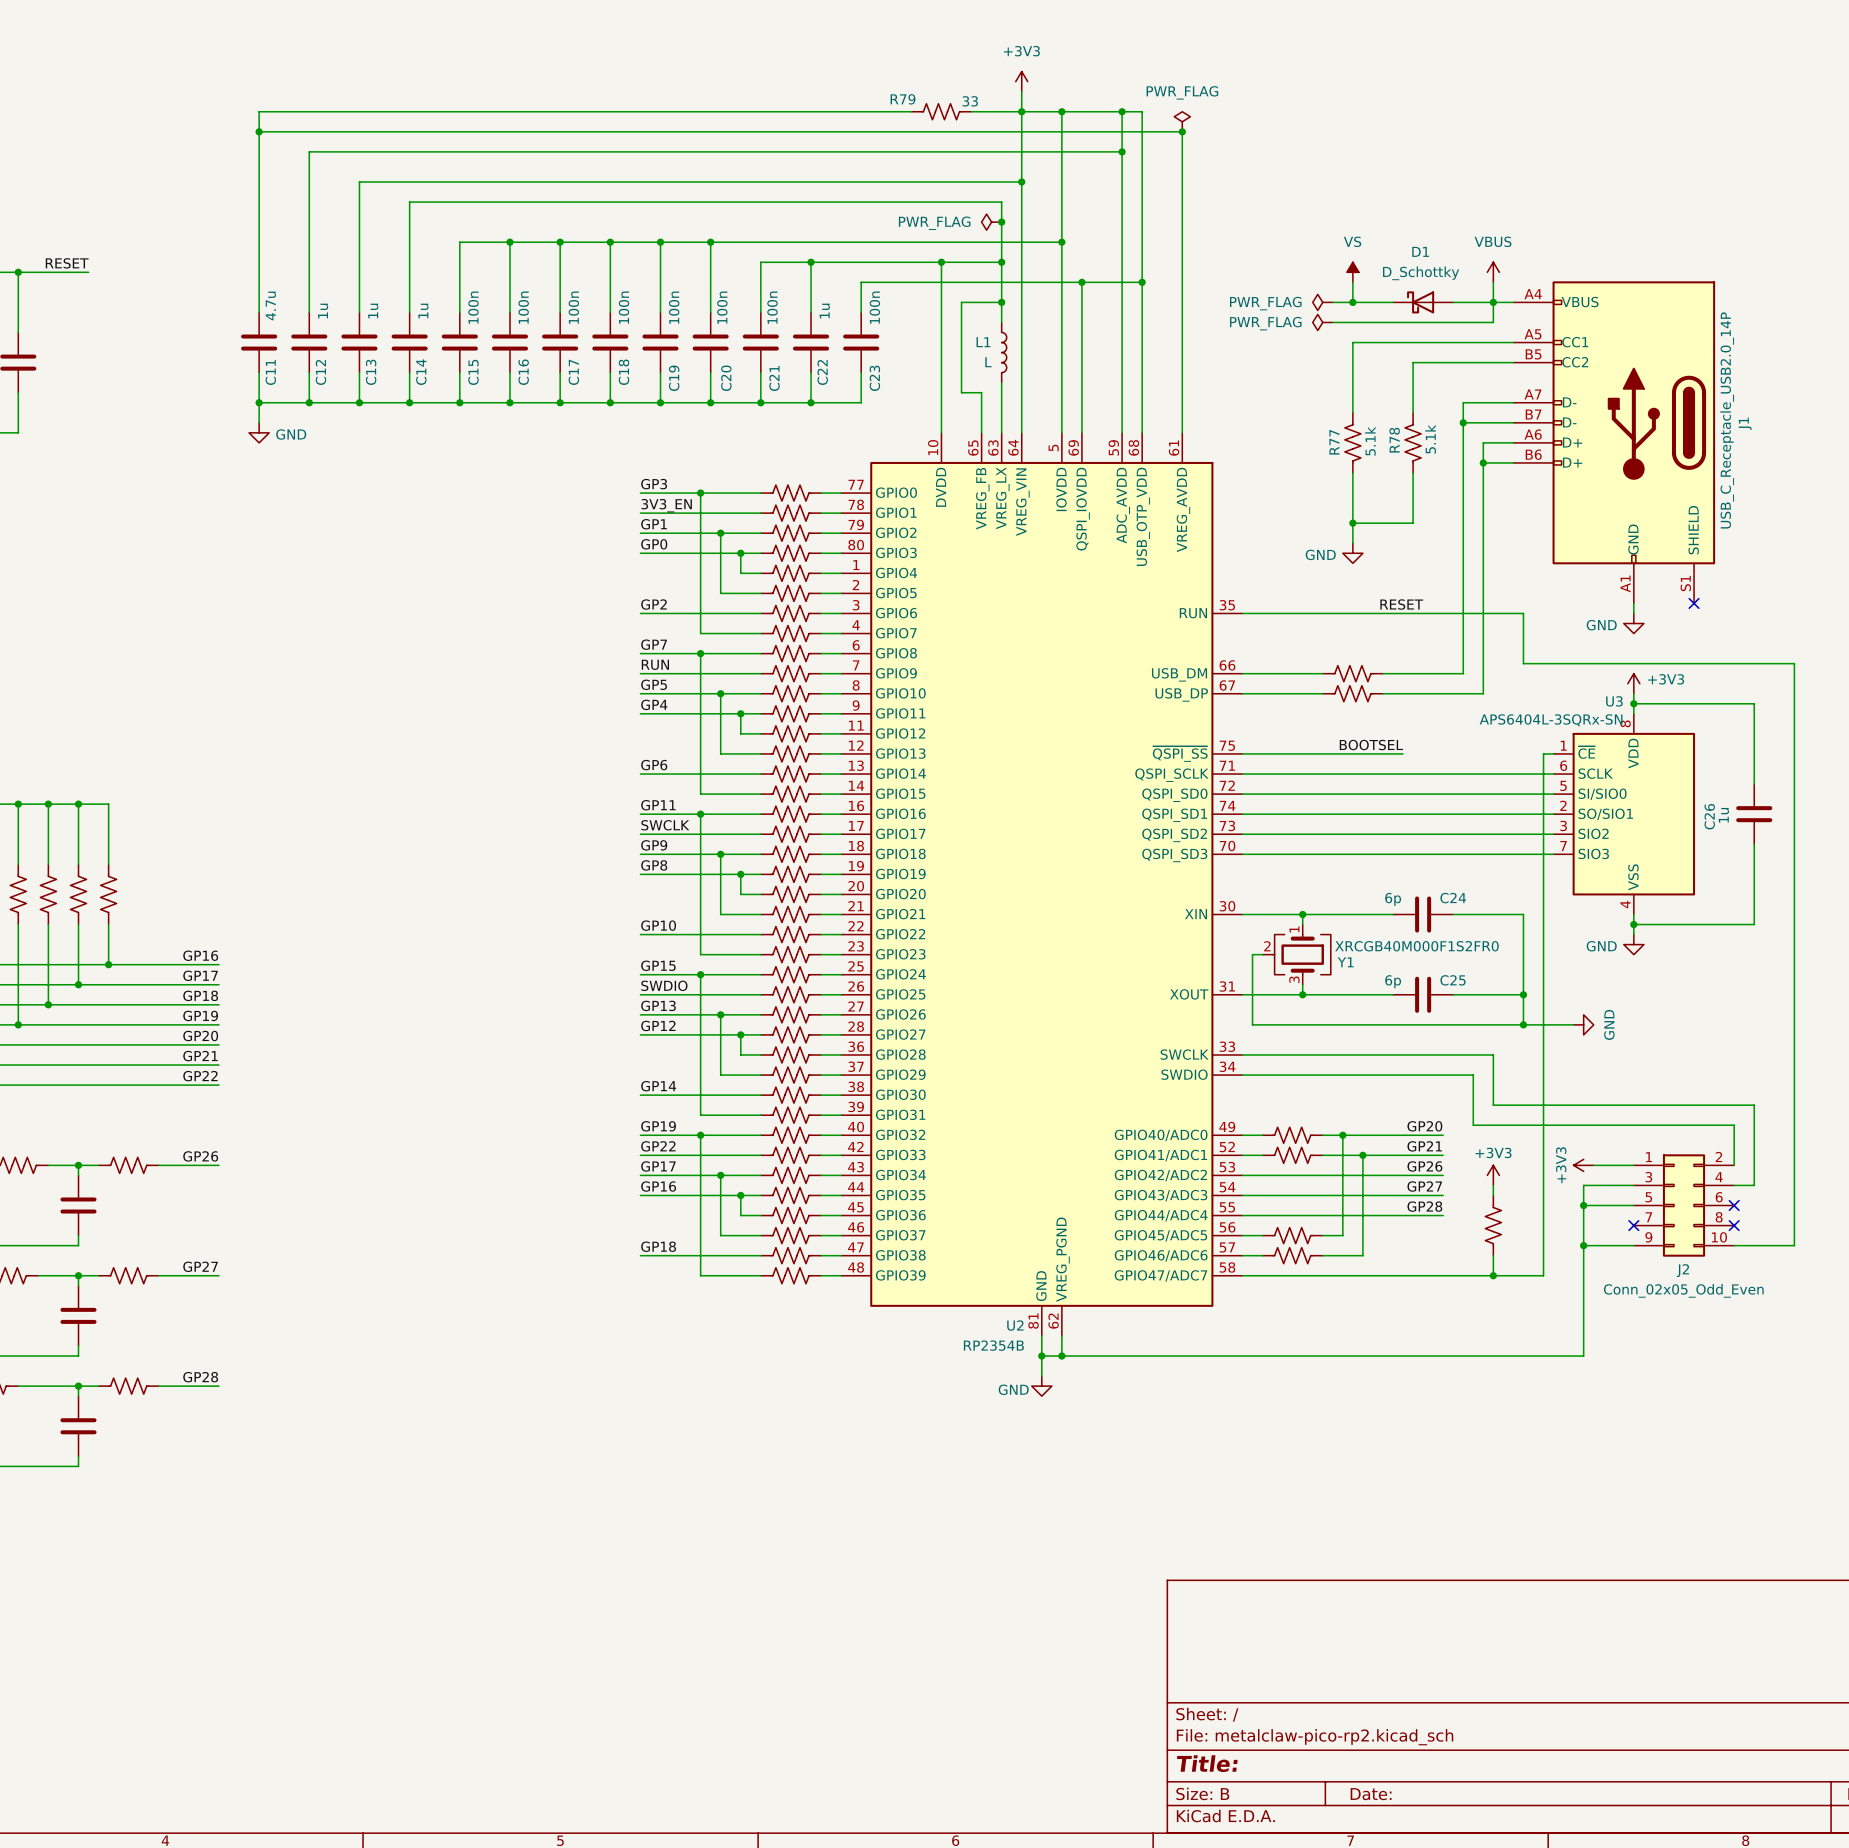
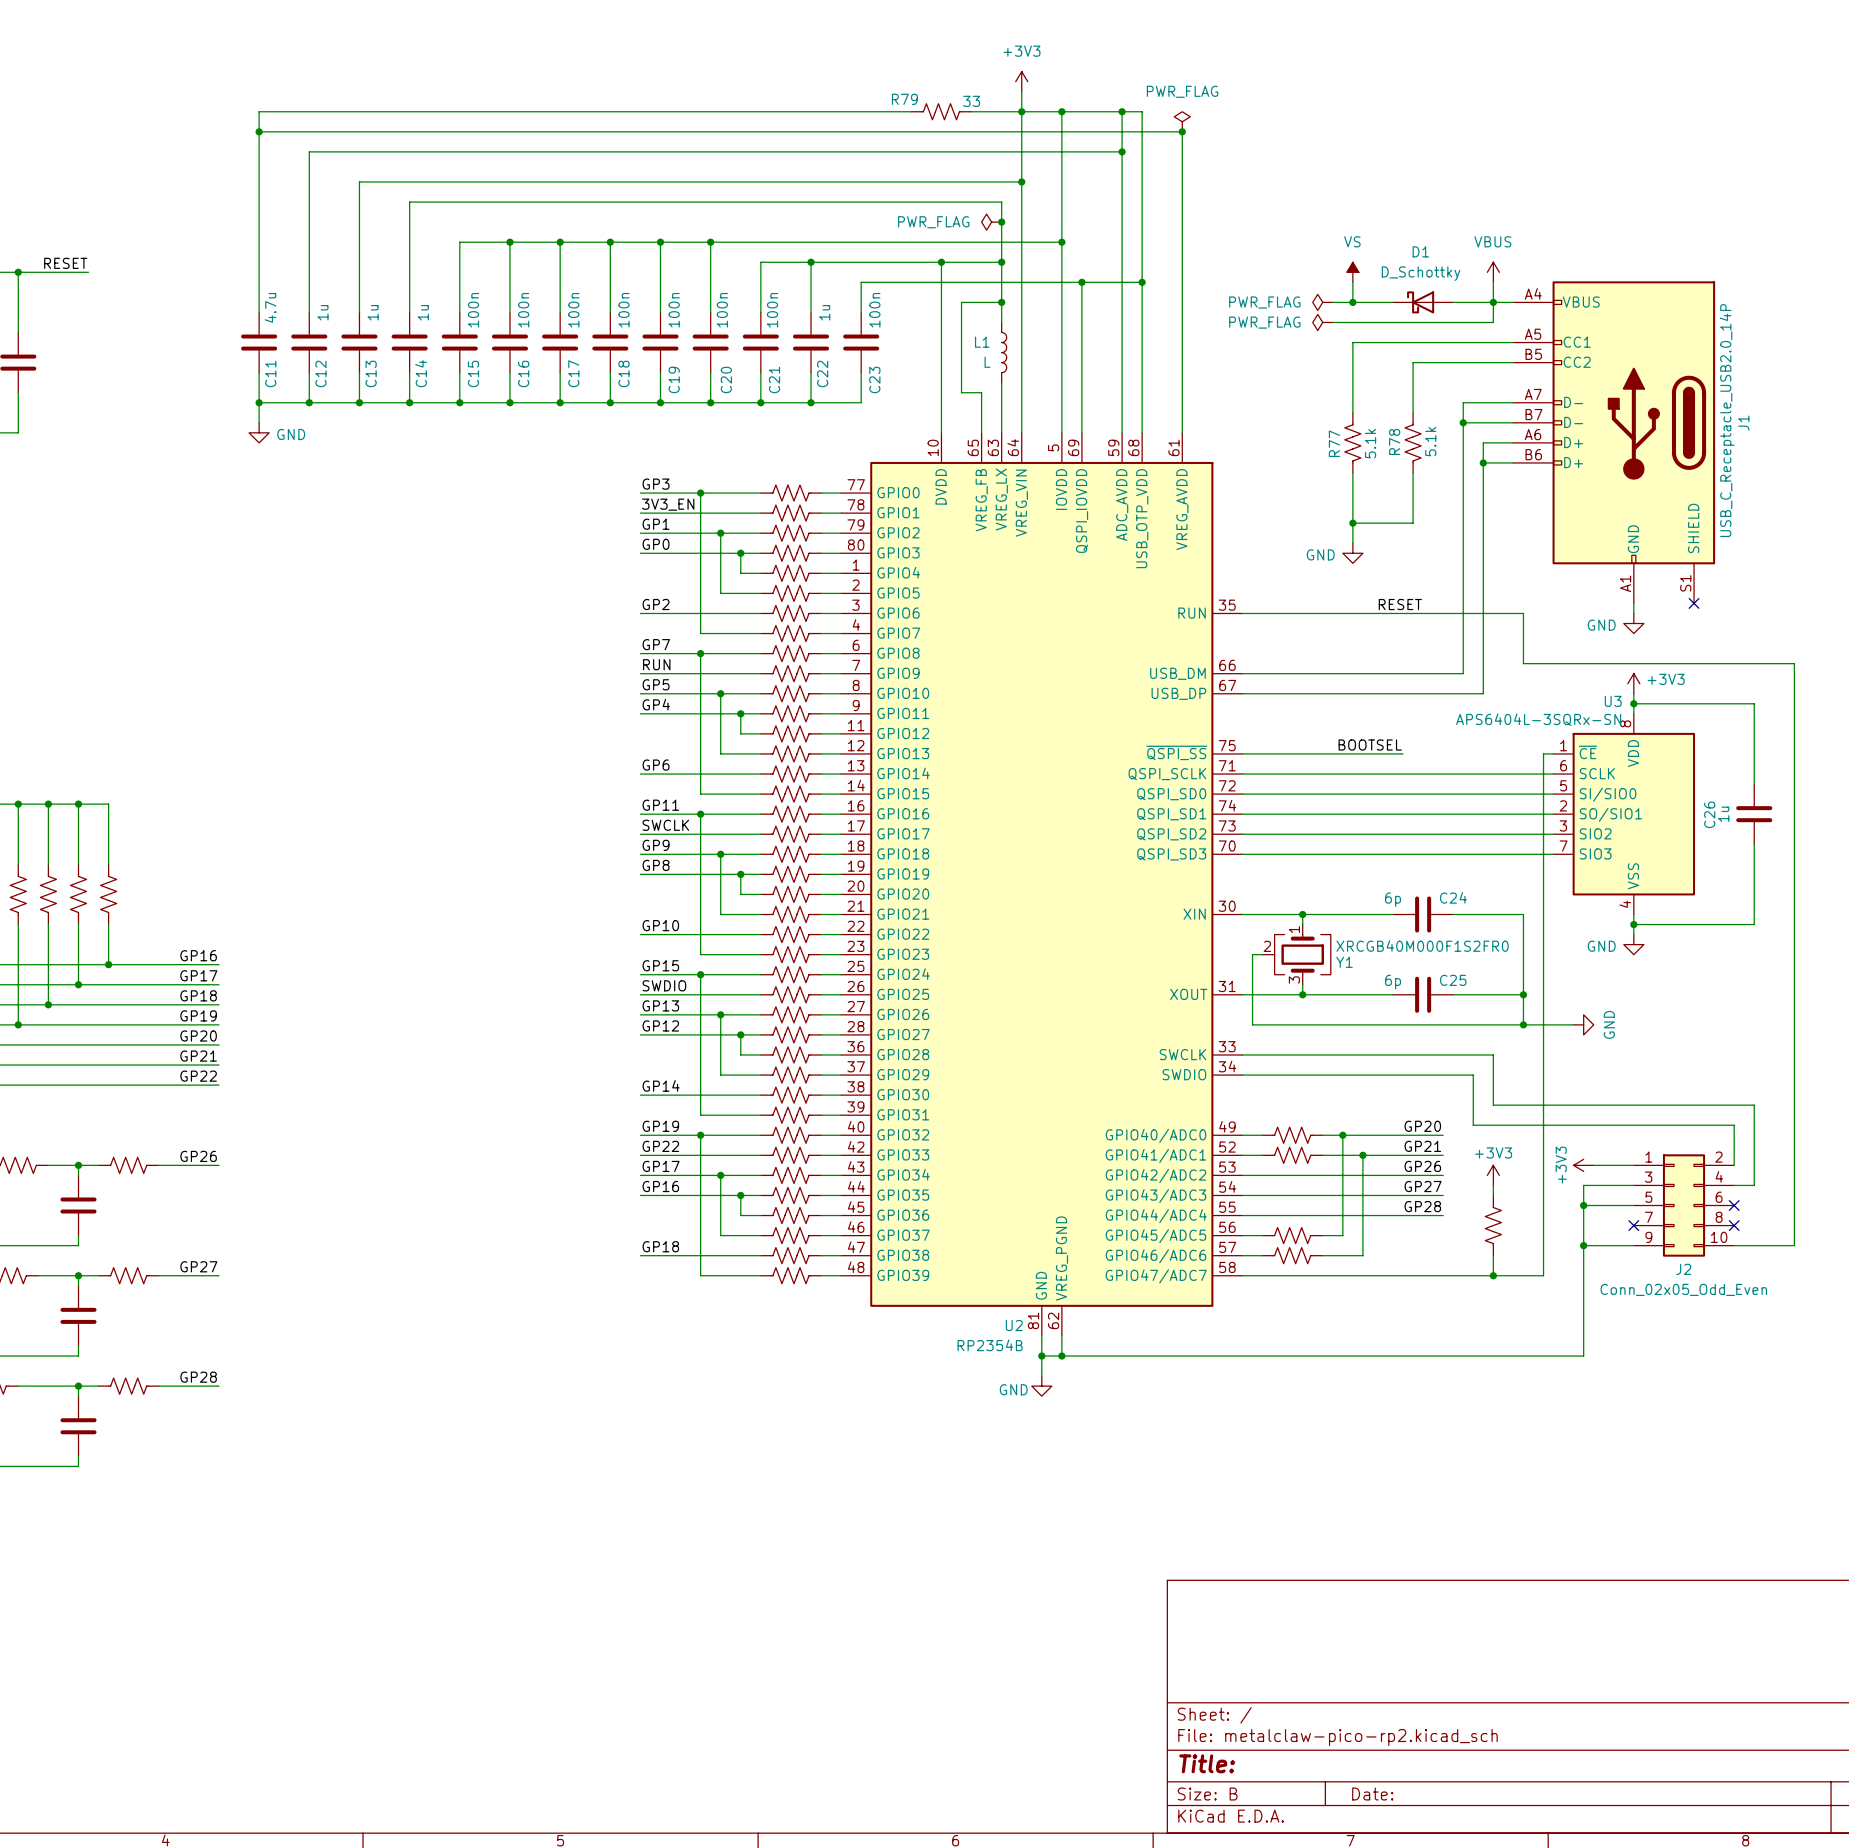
part: (1352, 673) -> none
part: (1352, 693) -> none

